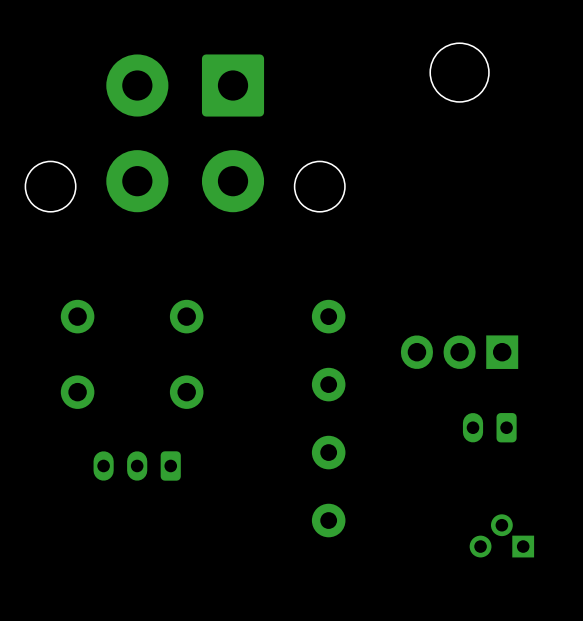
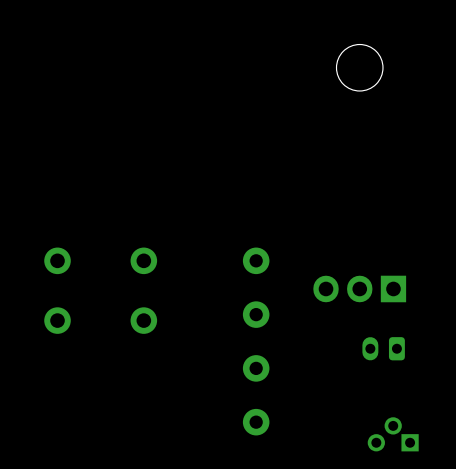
part: (185, 133) -> none
part: (137, 465) -> none

